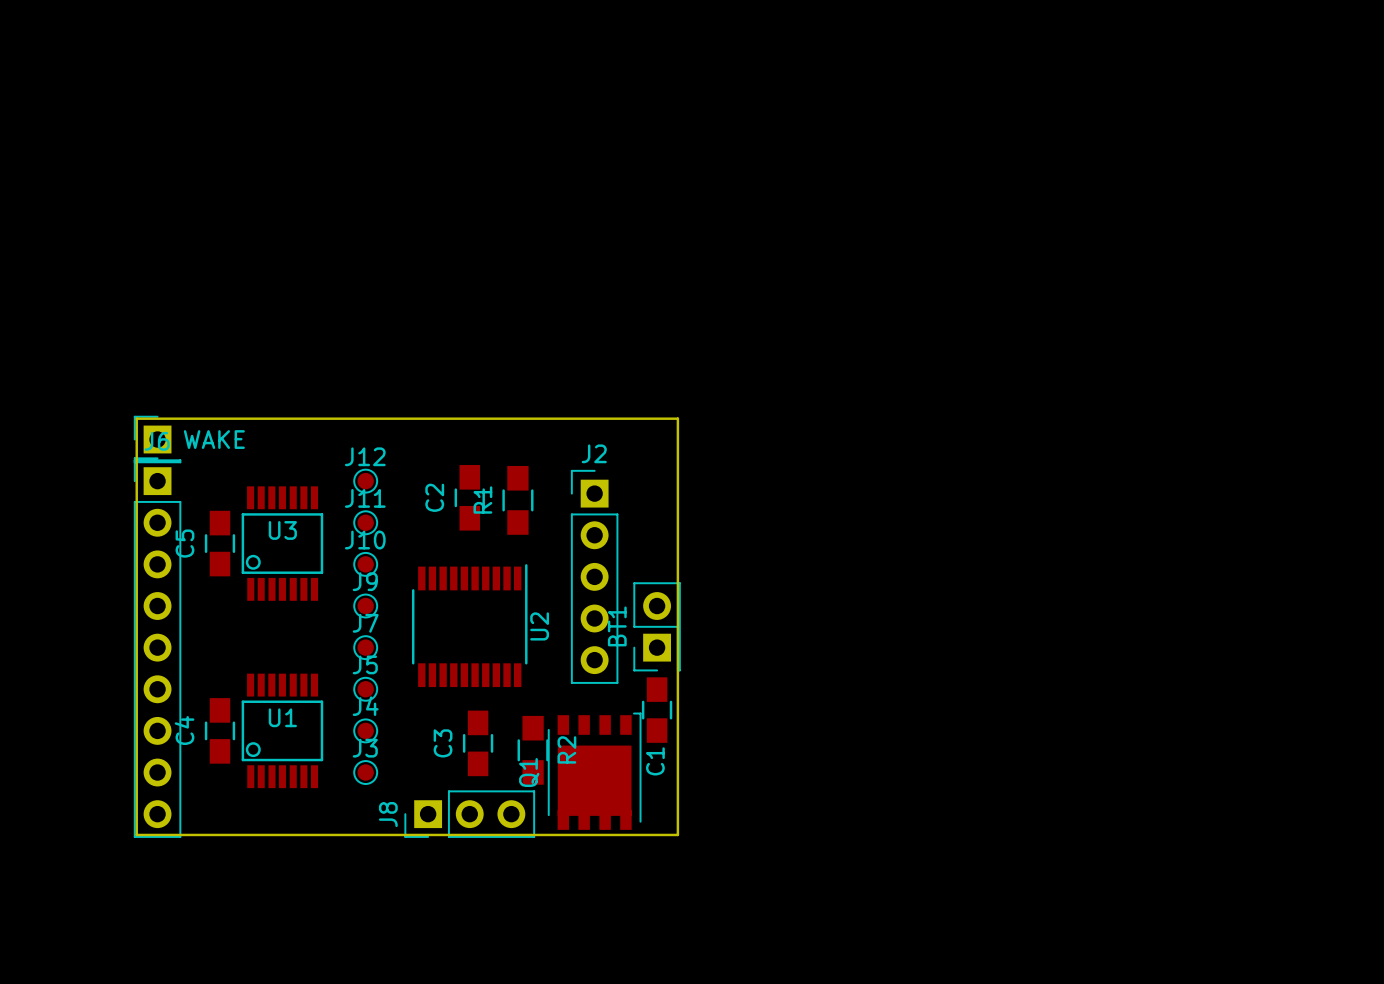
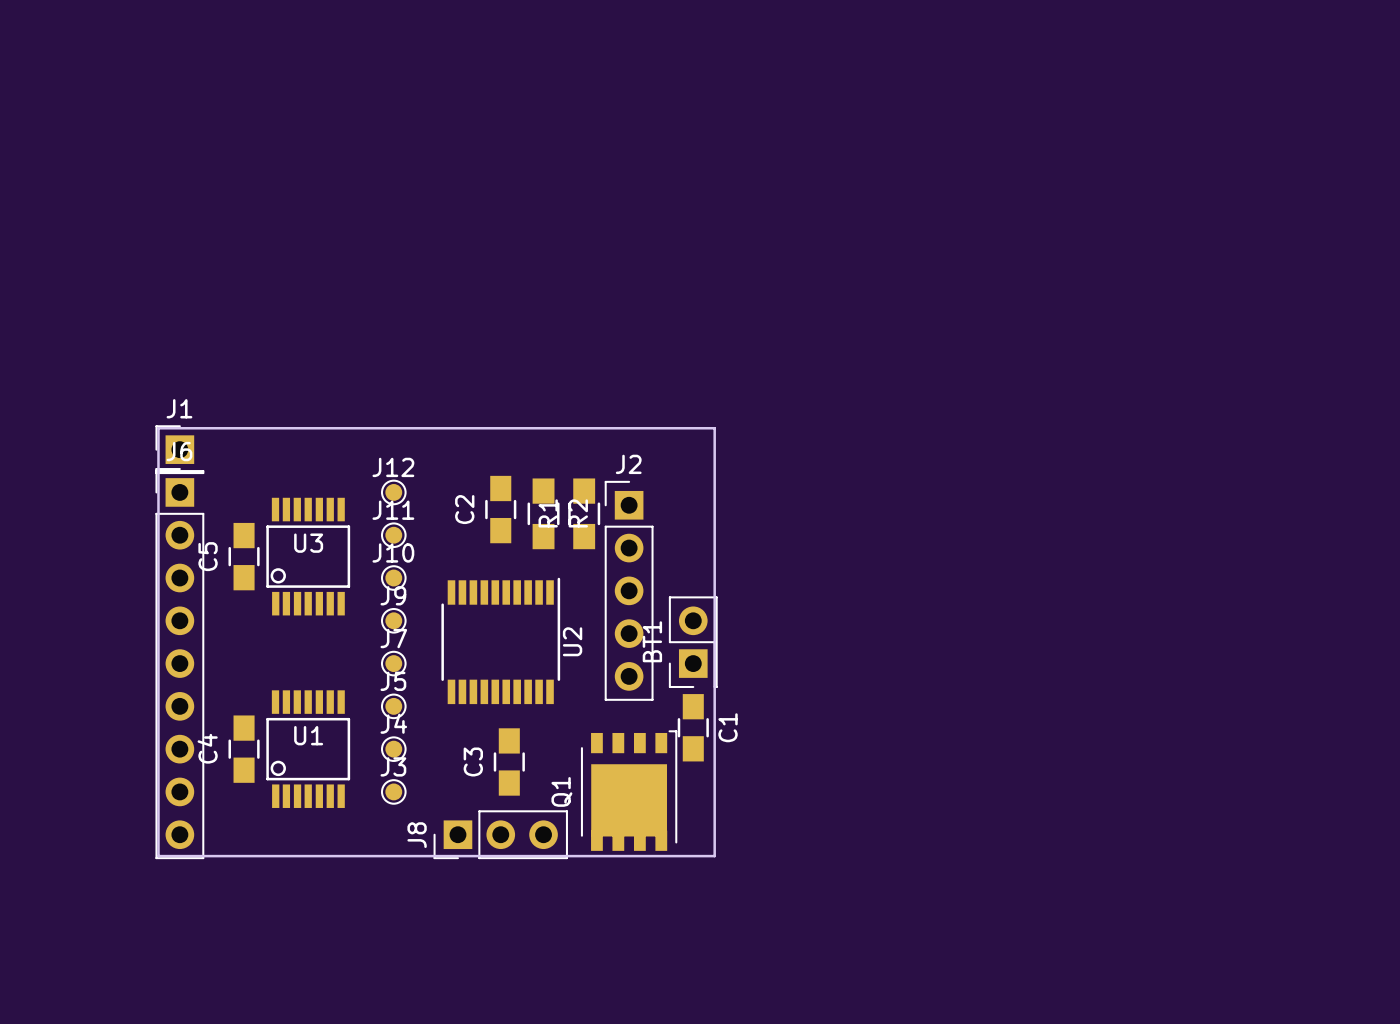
WAKE name: WAKE (214, 439) -> J1 (179, 408)
R1 position: (517, 500) -> (584, 513)
R2 position: (533, 750) -> (543, 513)
C1 name position: C1 (655, 761) -> C1 (728, 727)

